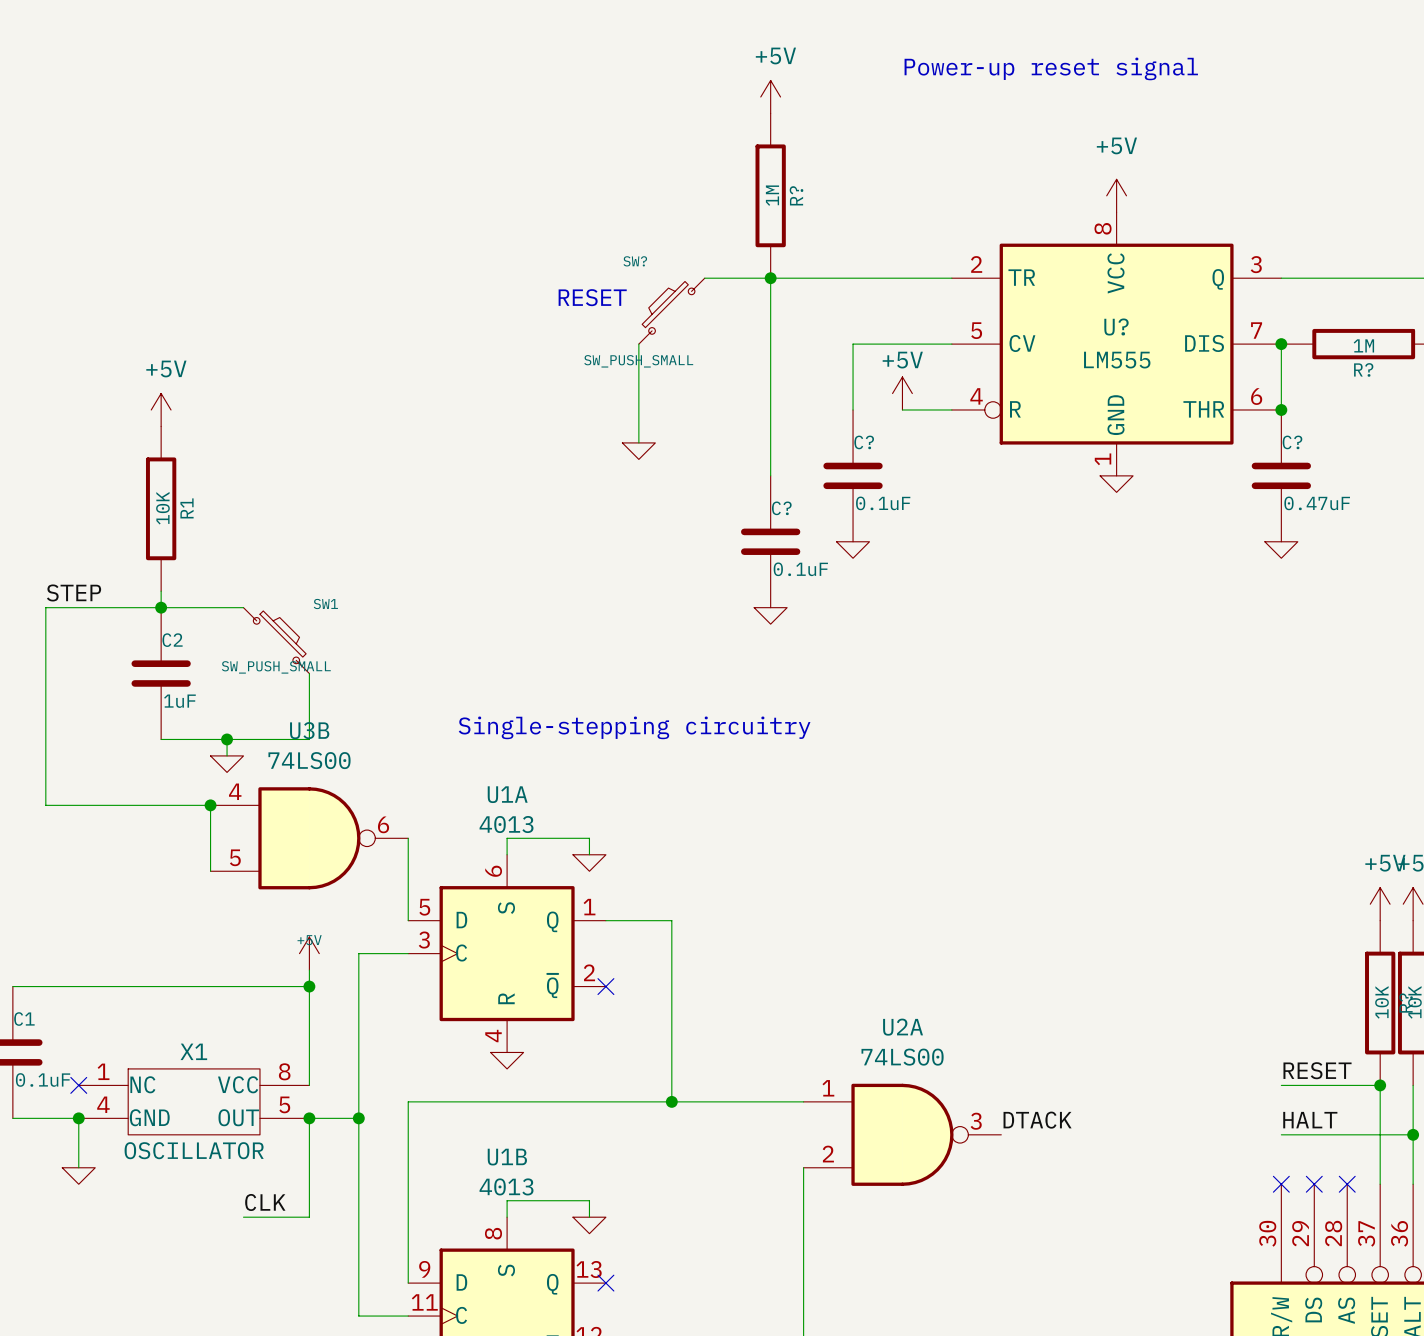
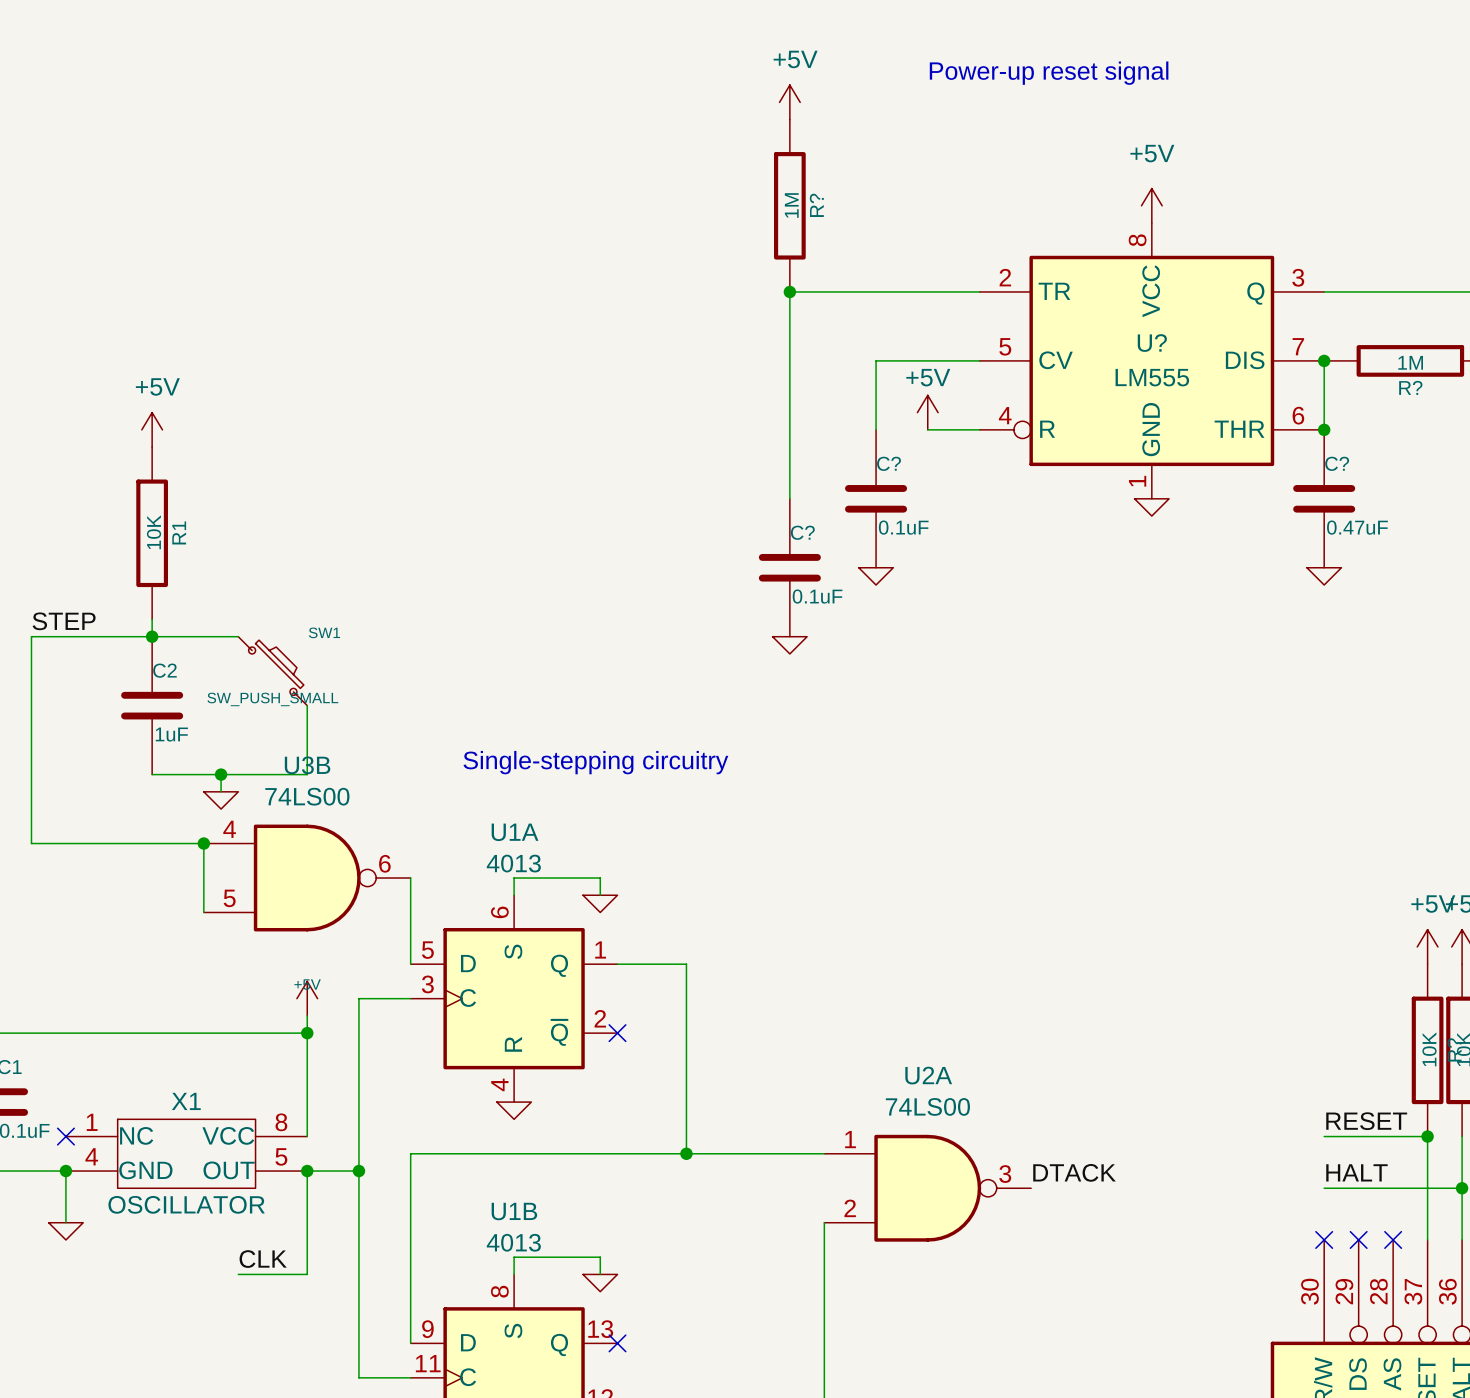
wire: (704, 278) (770, 278) -> none
text: RESET (592, 297) -> none
SW?: SW_PUSH_SMALL (671, 311) -> none
wire: (638, 344) (638, 442) -> none
power symbol: (638, 451) -> none

